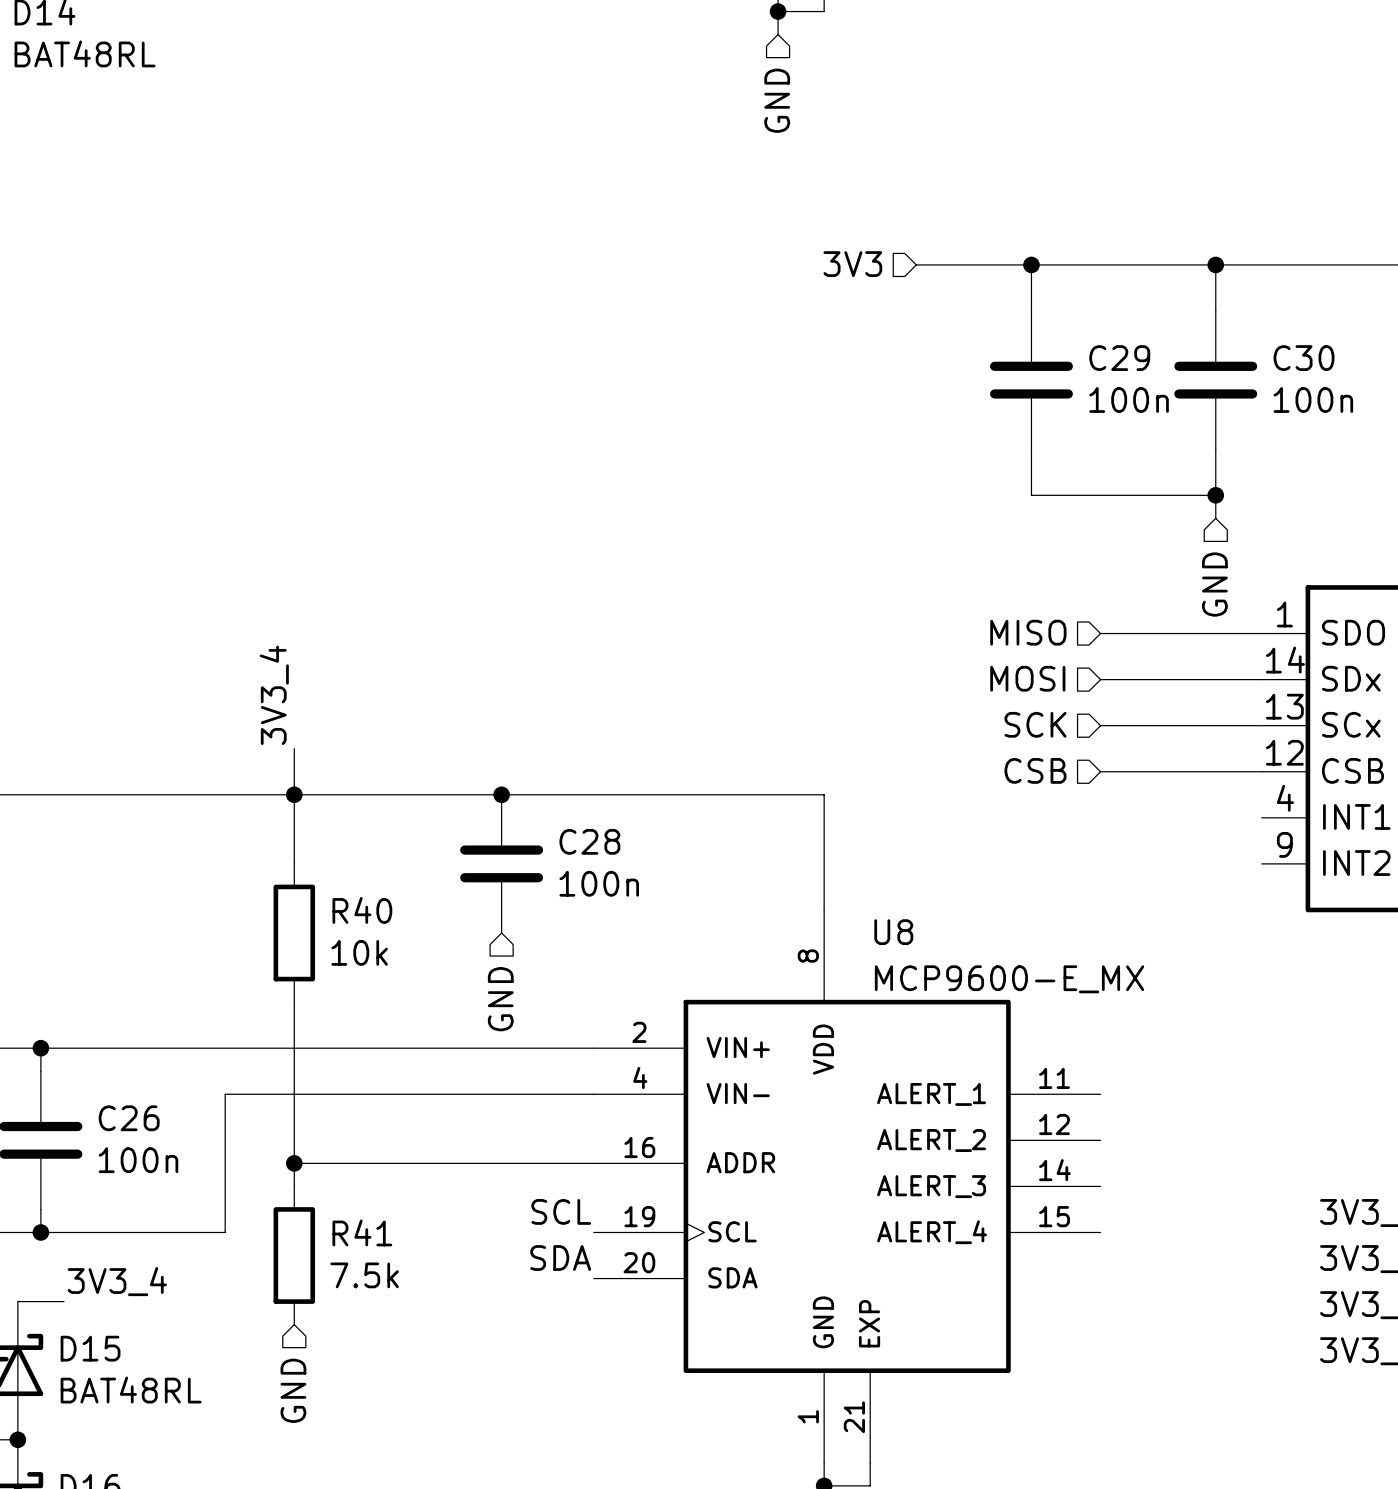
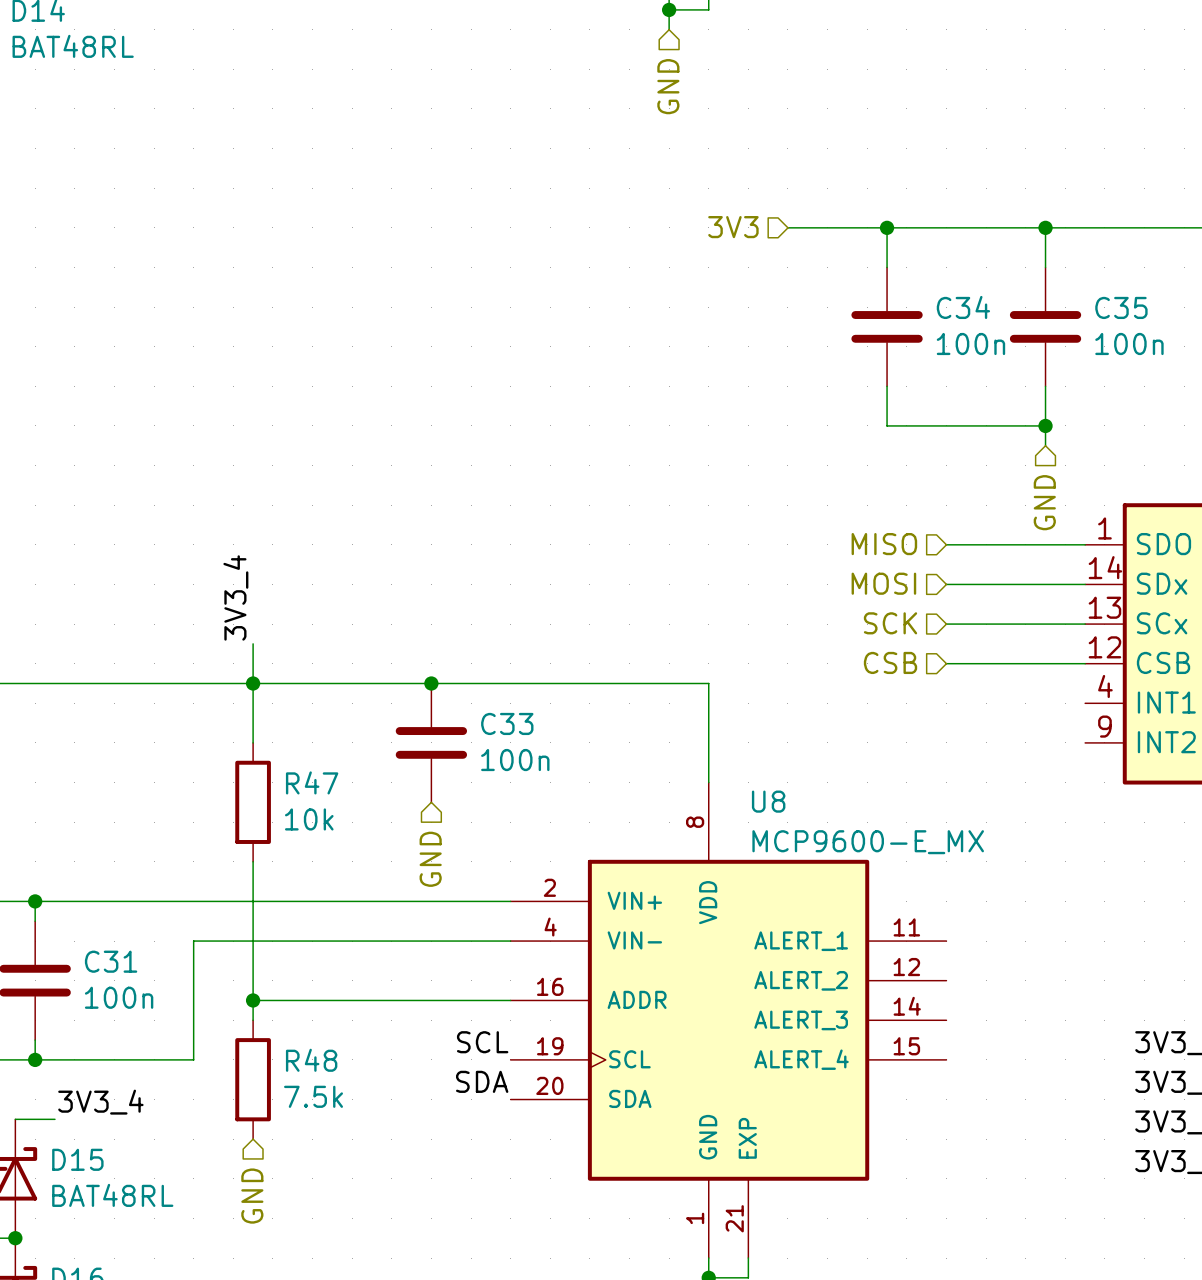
C29 name: C29 (1119, 358) -> C34 (963, 307)
C30 name: C30 (1304, 358) -> C35 (1121, 307)
C28 name: C28 (589, 841) -> C33 (507, 723)
R40 name: R40 (362, 910) -> R47 (312, 782)
C26 name: C26 (129, 1118) -> C31 (111, 961)
R41 name: R41 (362, 1232) -> R48 (311, 1060)

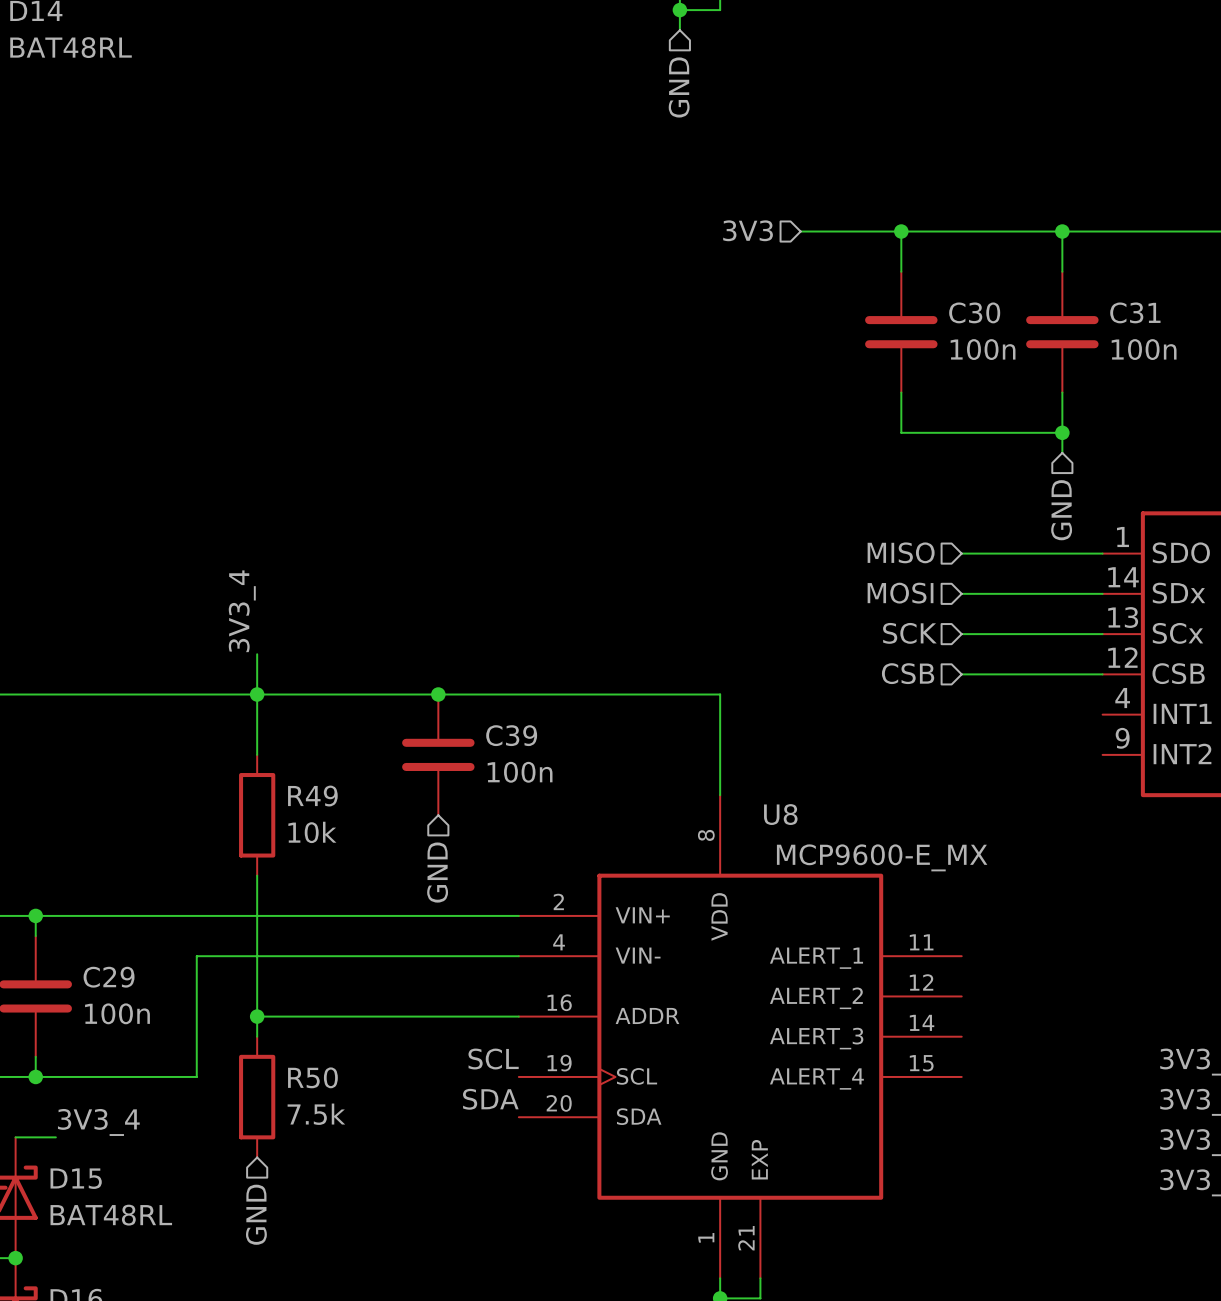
C34 name: C34 (963, 307) -> C30 (974, 312)
C35 name: C35 (1121, 307) -> C31 (1135, 312)
C33 name: C33 (507, 723) -> C39 (511, 735)
R47 name: R47 (312, 782) -> R49 (312, 796)
C31 name: C31 (111, 961) -> C29 (109, 977)
R48 name: R48 (311, 1060) -> R50 (312, 1077)

